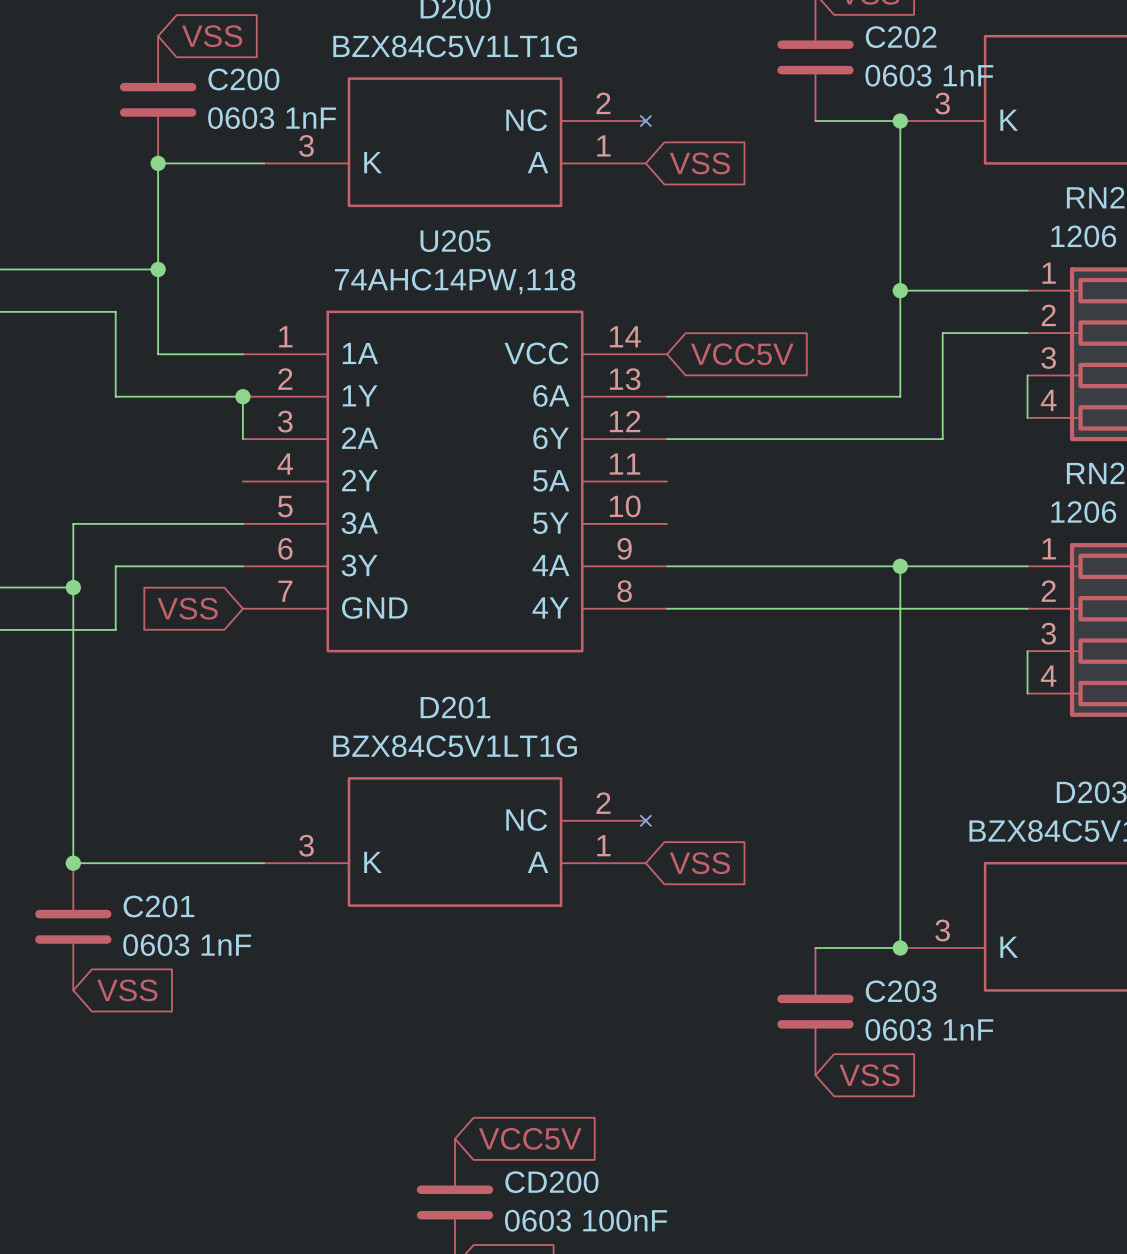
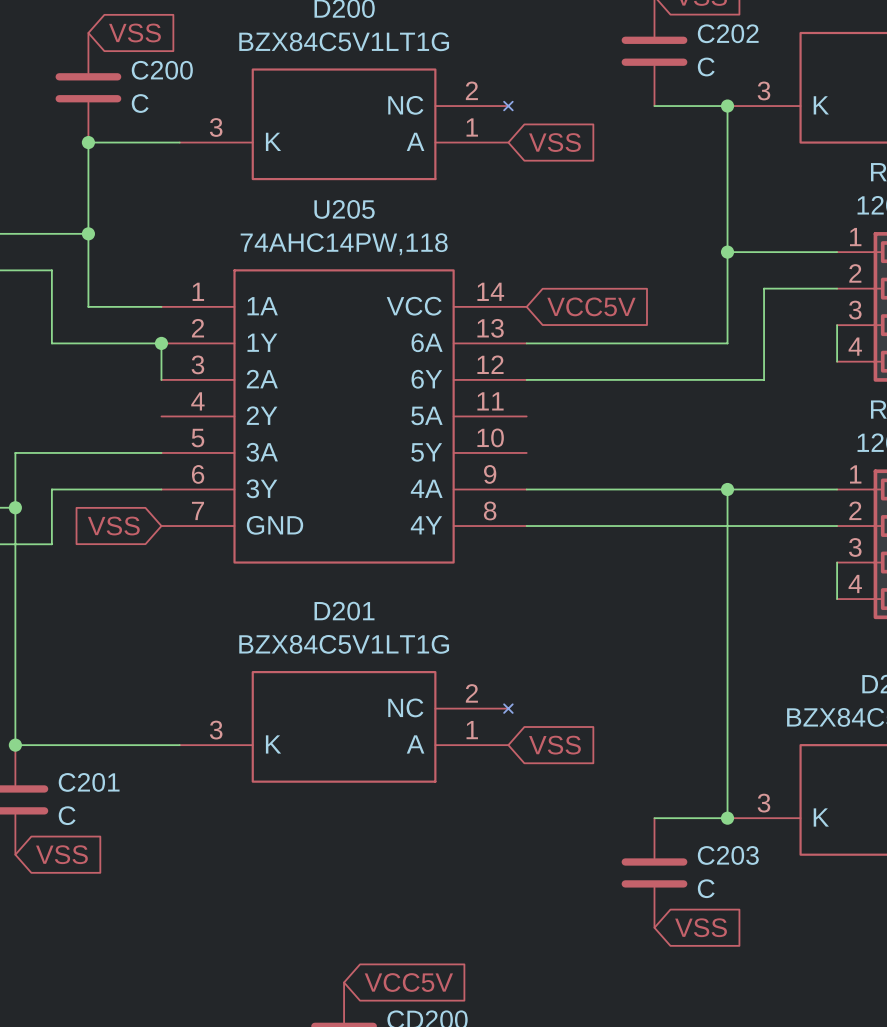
C202 value: 0603 1nF (929, 75) -> C (706, 67)
C200 value: 0603 1nF (272, 118) -> C (140, 103)
C201 value: 0603 1nF (187, 945) -> C (67, 815)
C203 value: 0603 1nF (929, 1029) -> C (706, 888)

